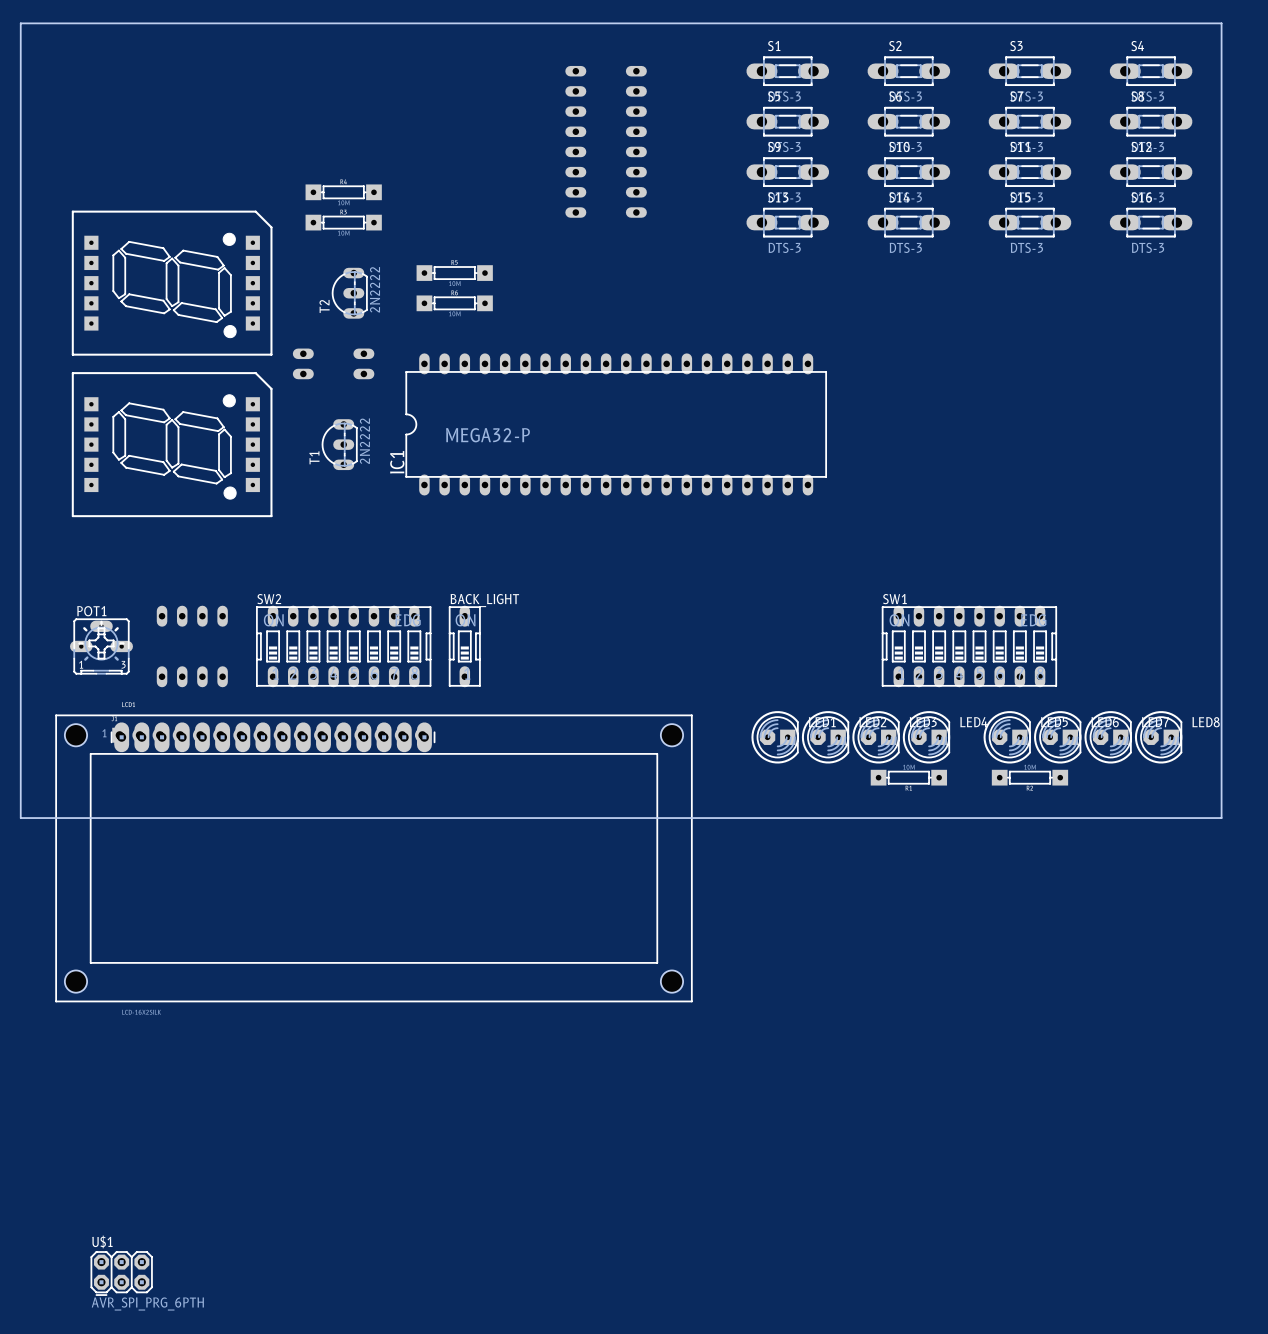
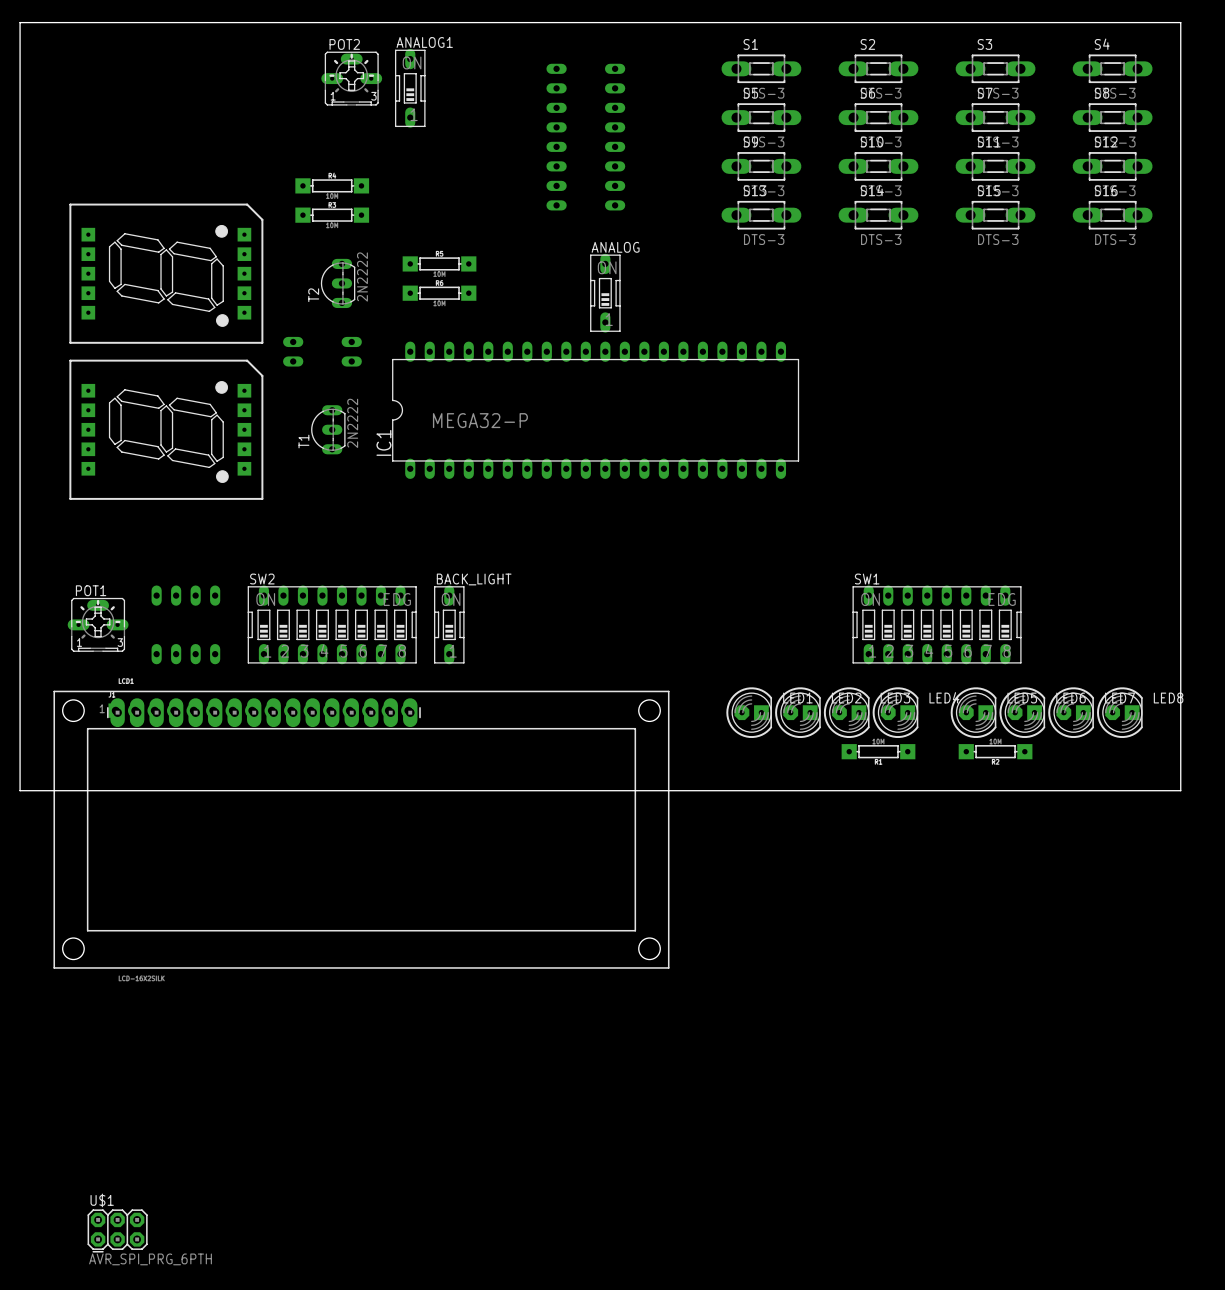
POT2: none -> (351, 78)
ANALOG1: none -> (410, 88)
ANALOG: none -> (605, 293)

